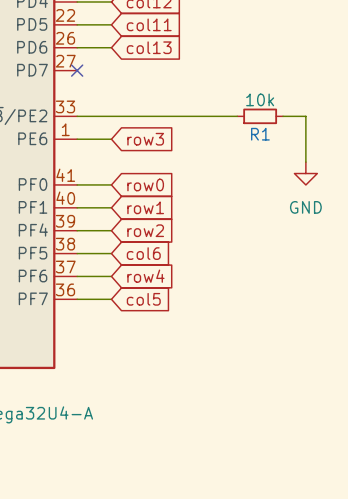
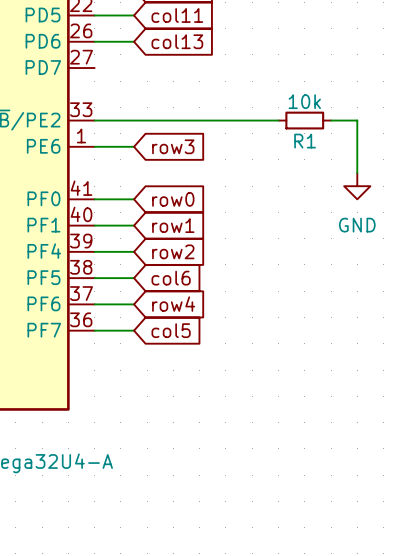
no-connect mark: (77, 70) -> none

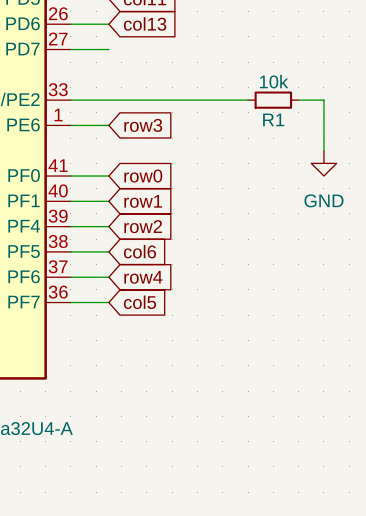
wire: none -> (70, 49) (108, 49)

